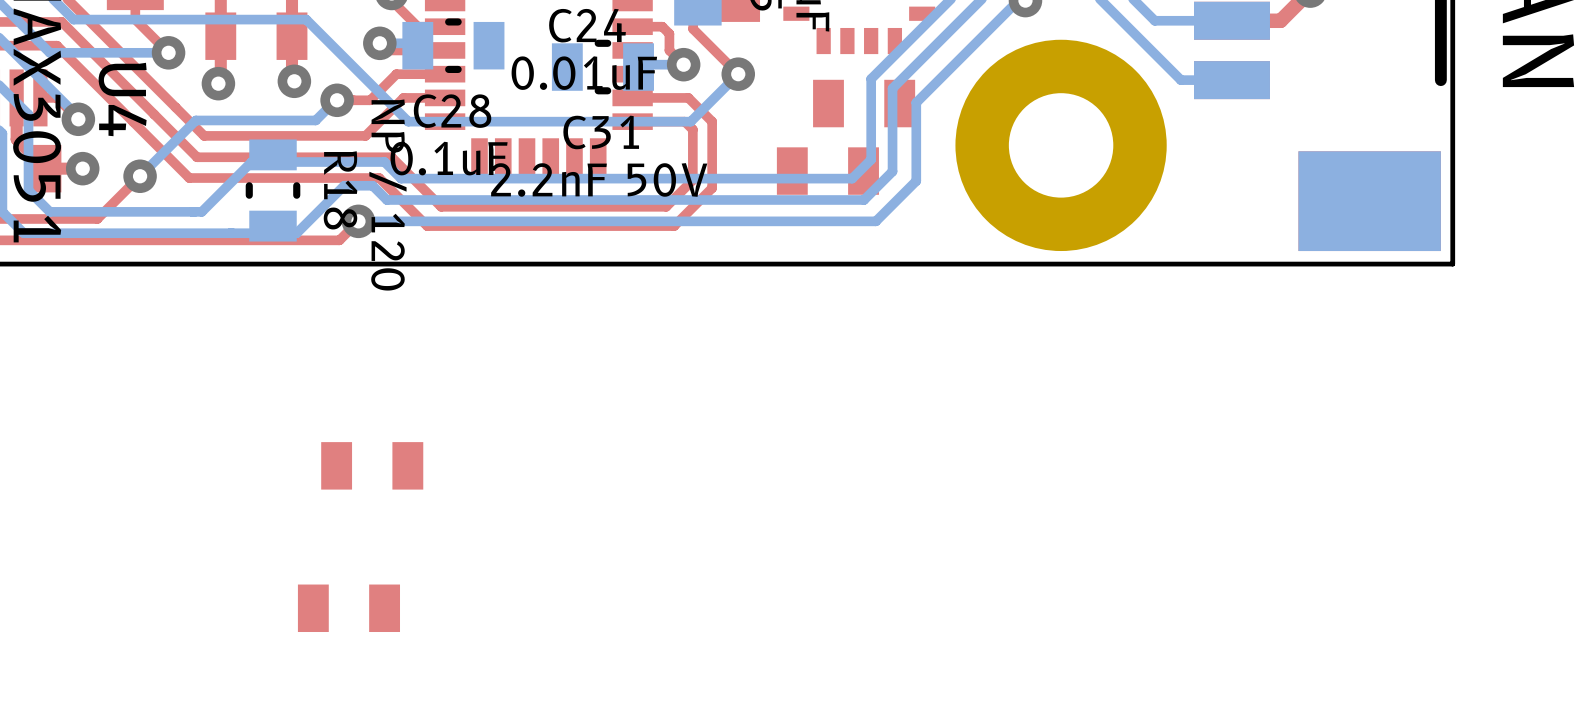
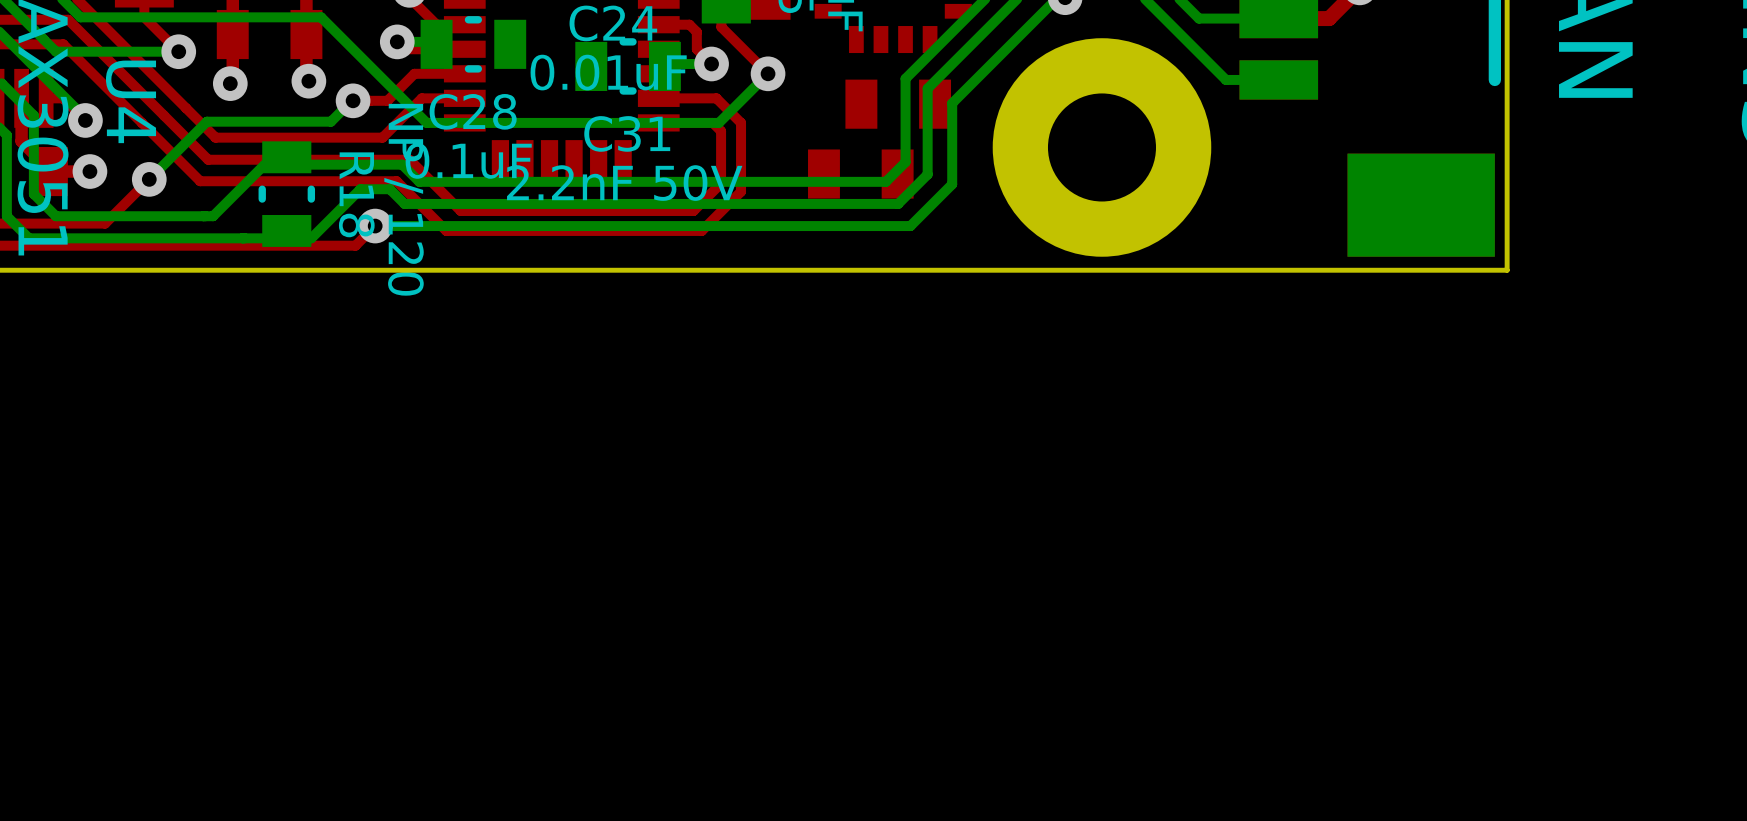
part: (372, 465) -> none
part: (348, 608) -> none

